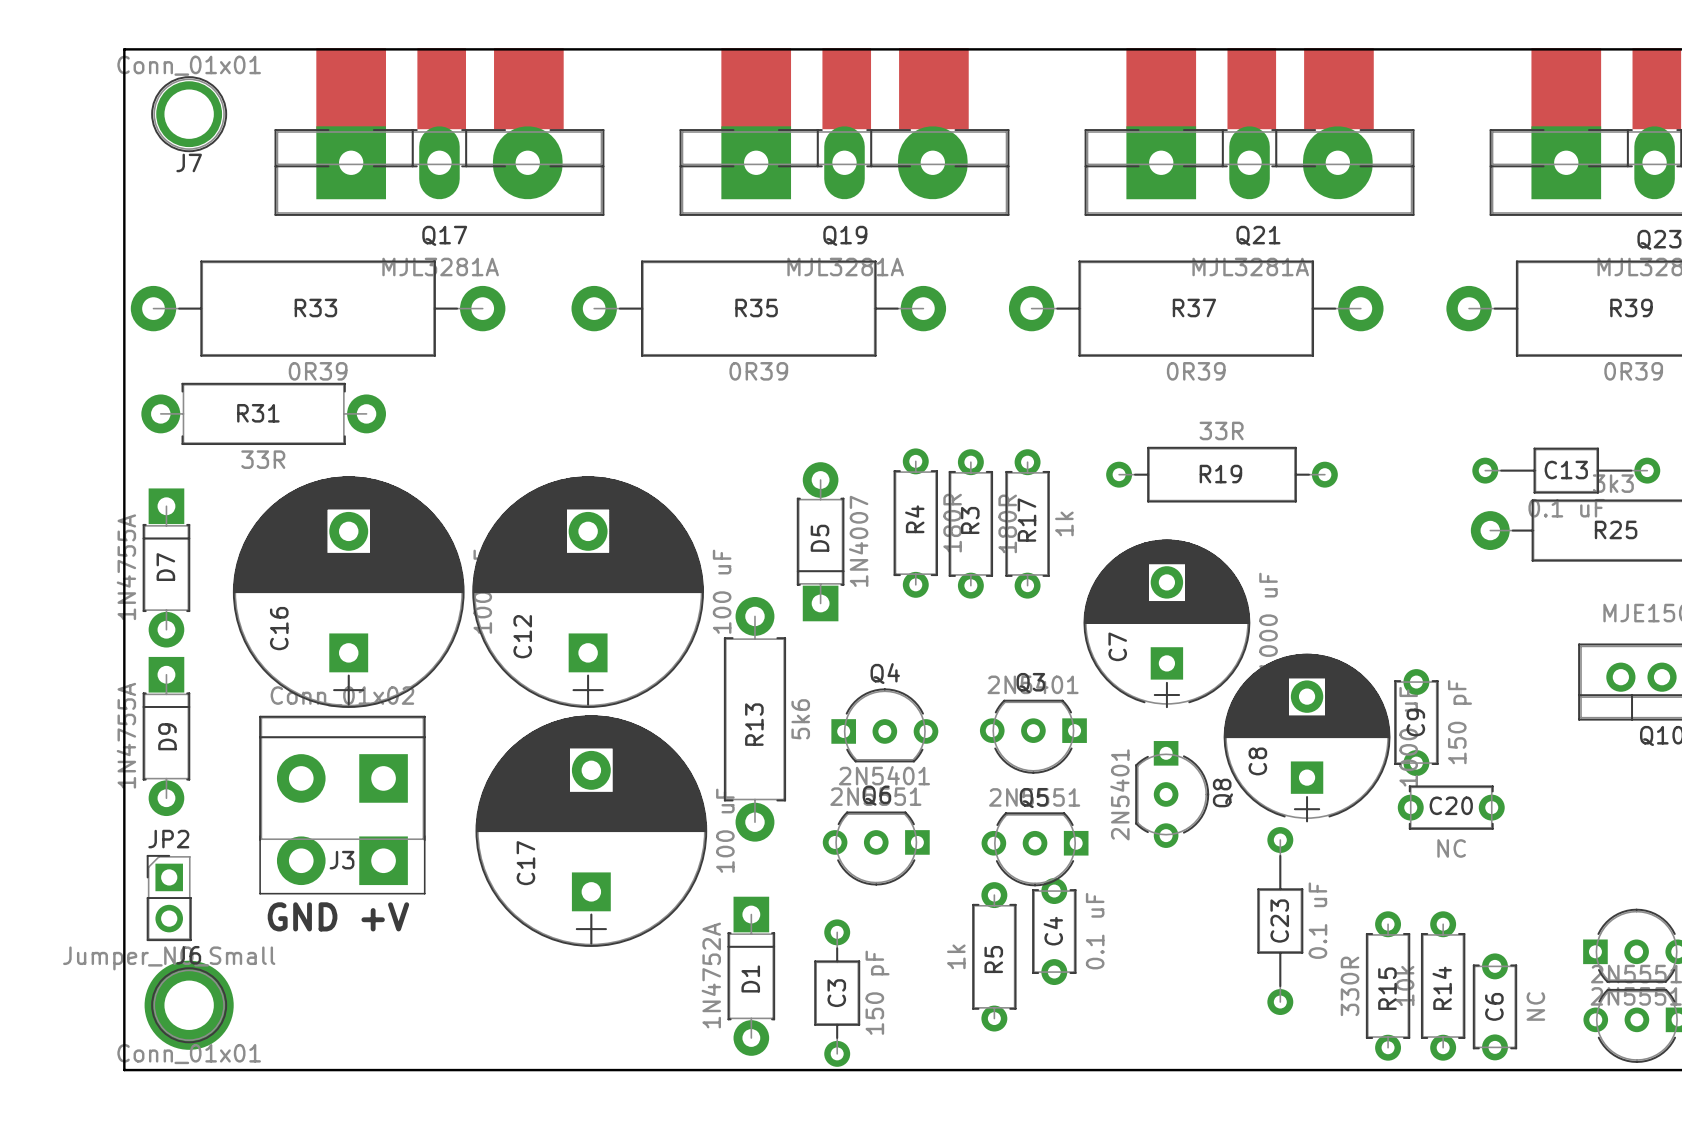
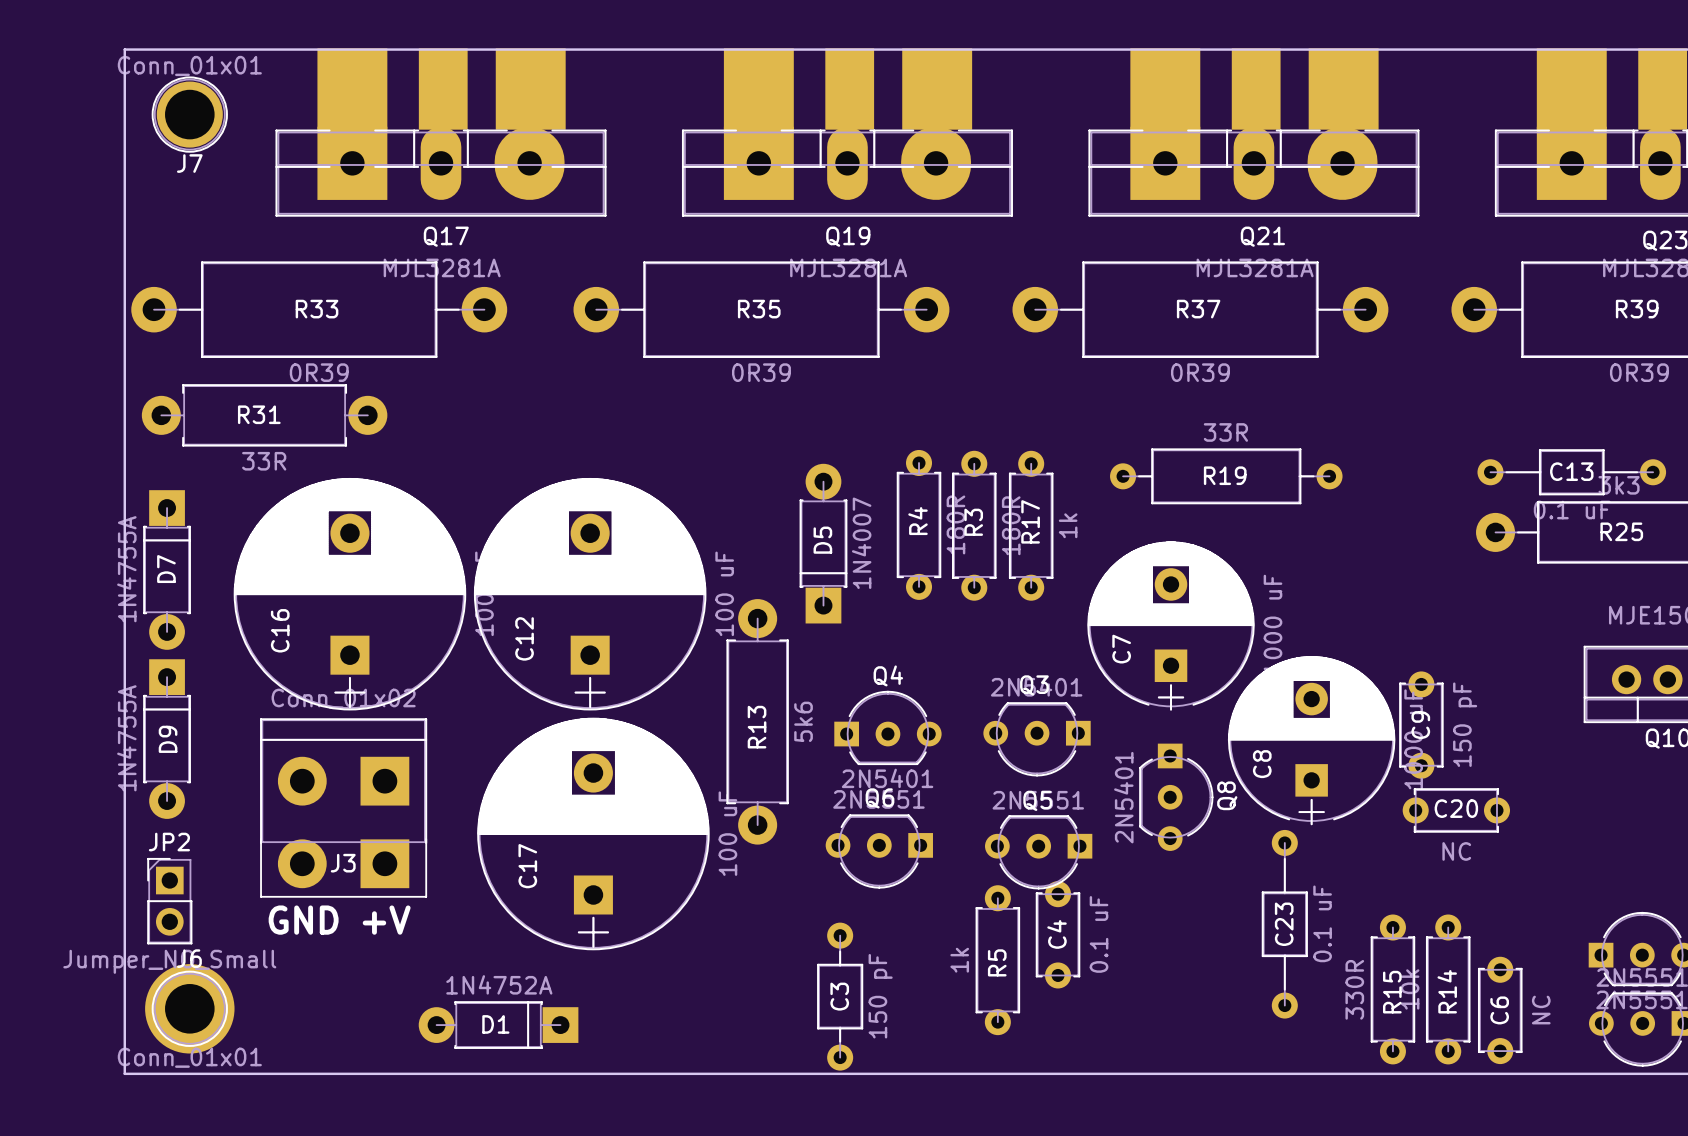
D1 rotation: 0° (751, 976) -> 90° clockwise (498, 1025)
D1 position: (751, 976) -> (498, 1025)

